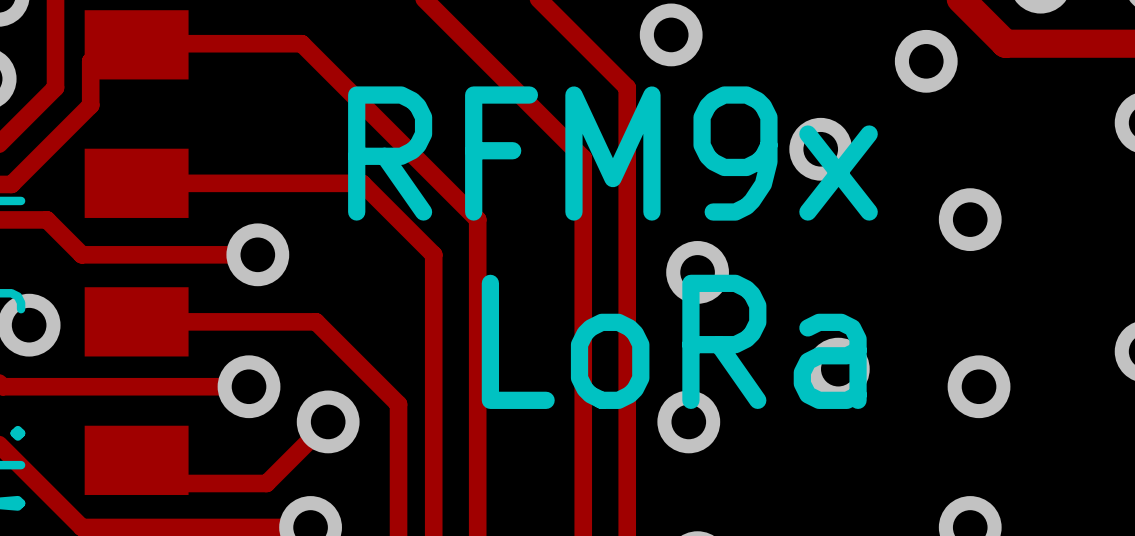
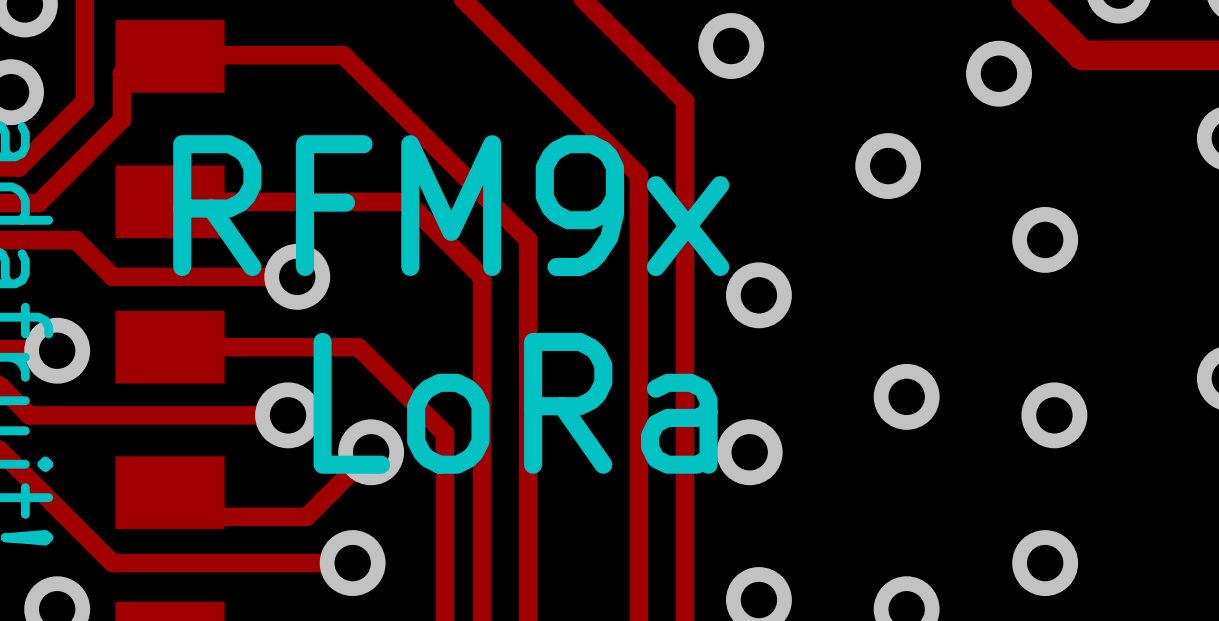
text position: RFM9x (612, 153) -> RFM9x (451, 205)
text position: LoRa (674, 341) -> LoRa (515, 403)

